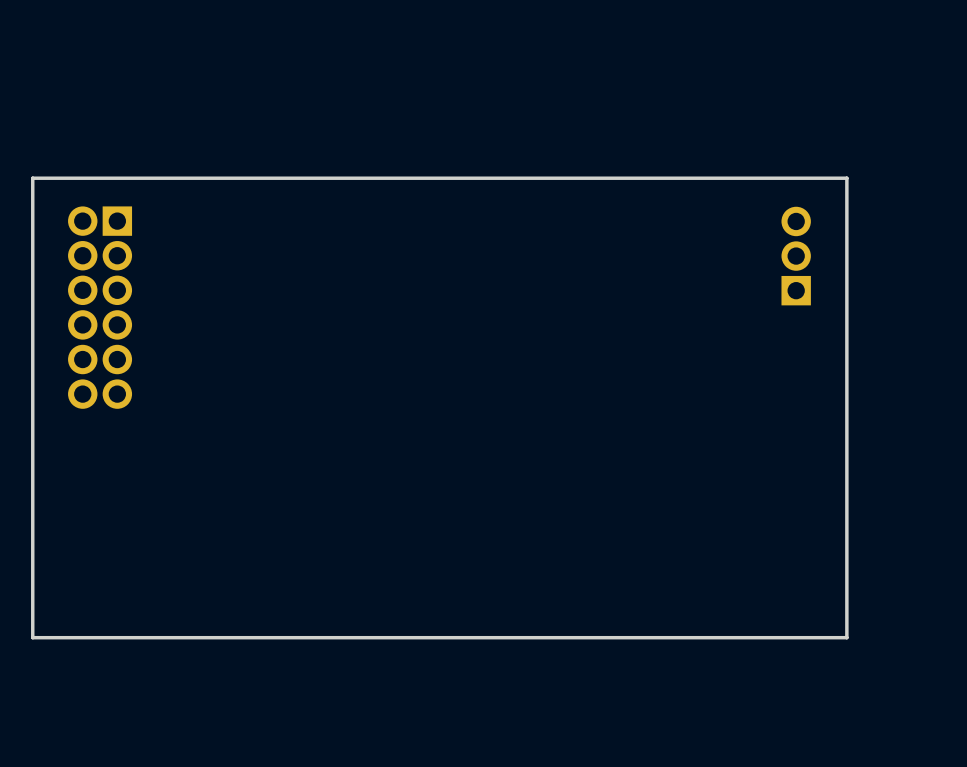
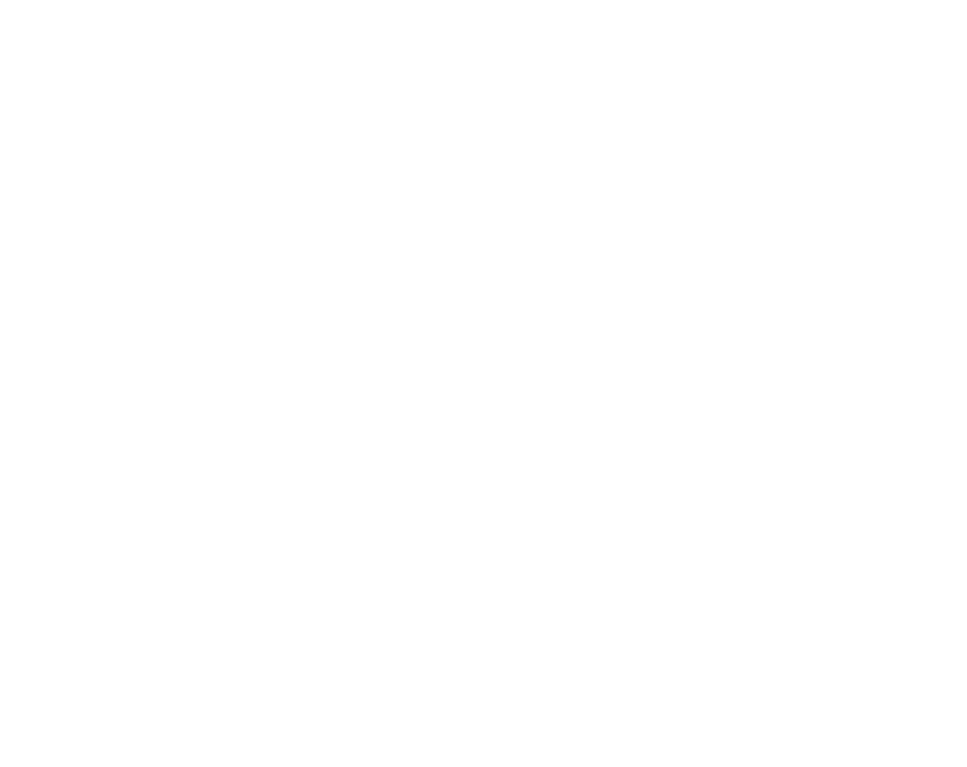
board edge: (846, 178) (32, 178) (32, 637) (846, 637) (846, 178) -> none
part: (796, 256) -> none
part: (100, 307) -> none

